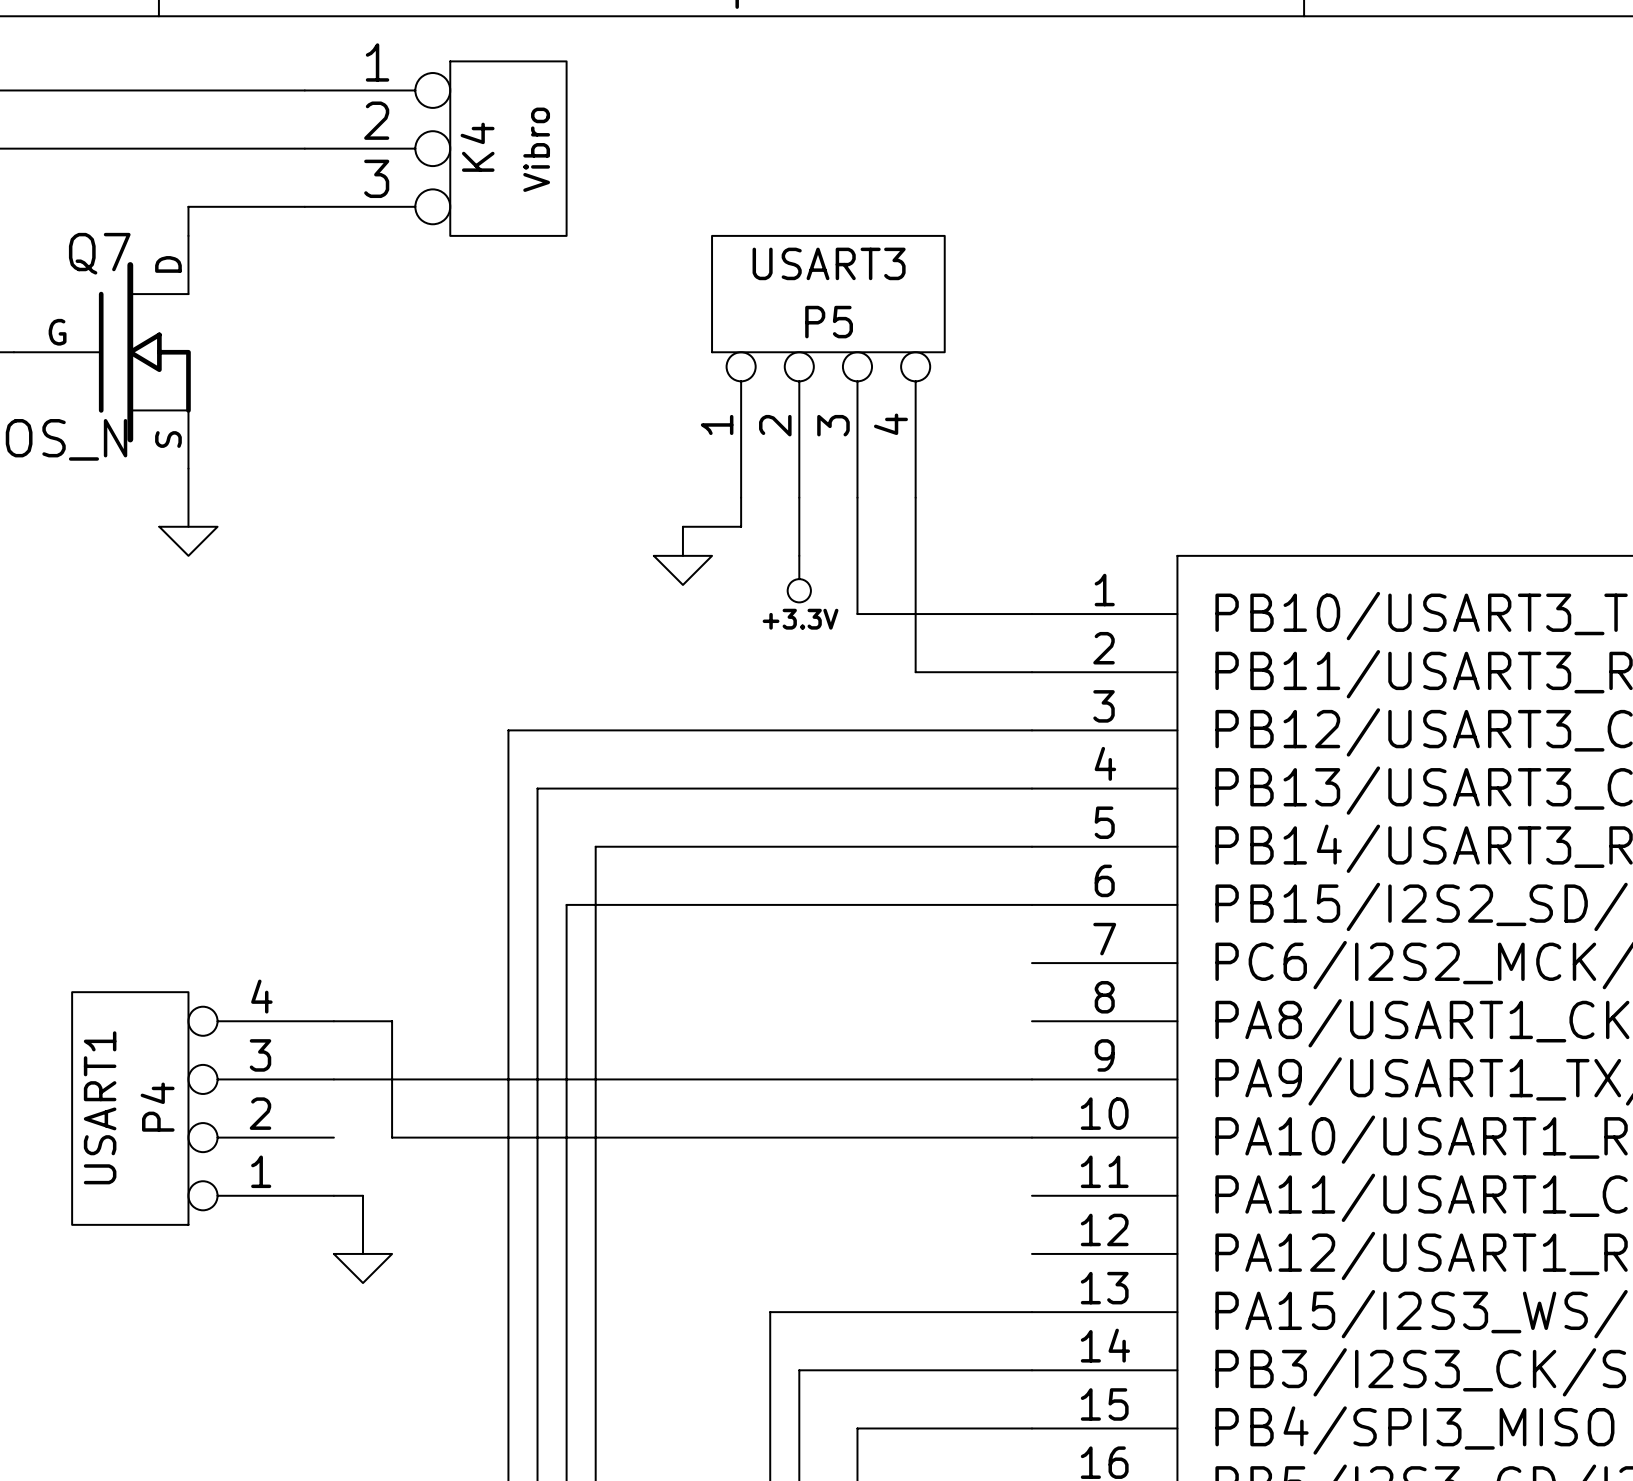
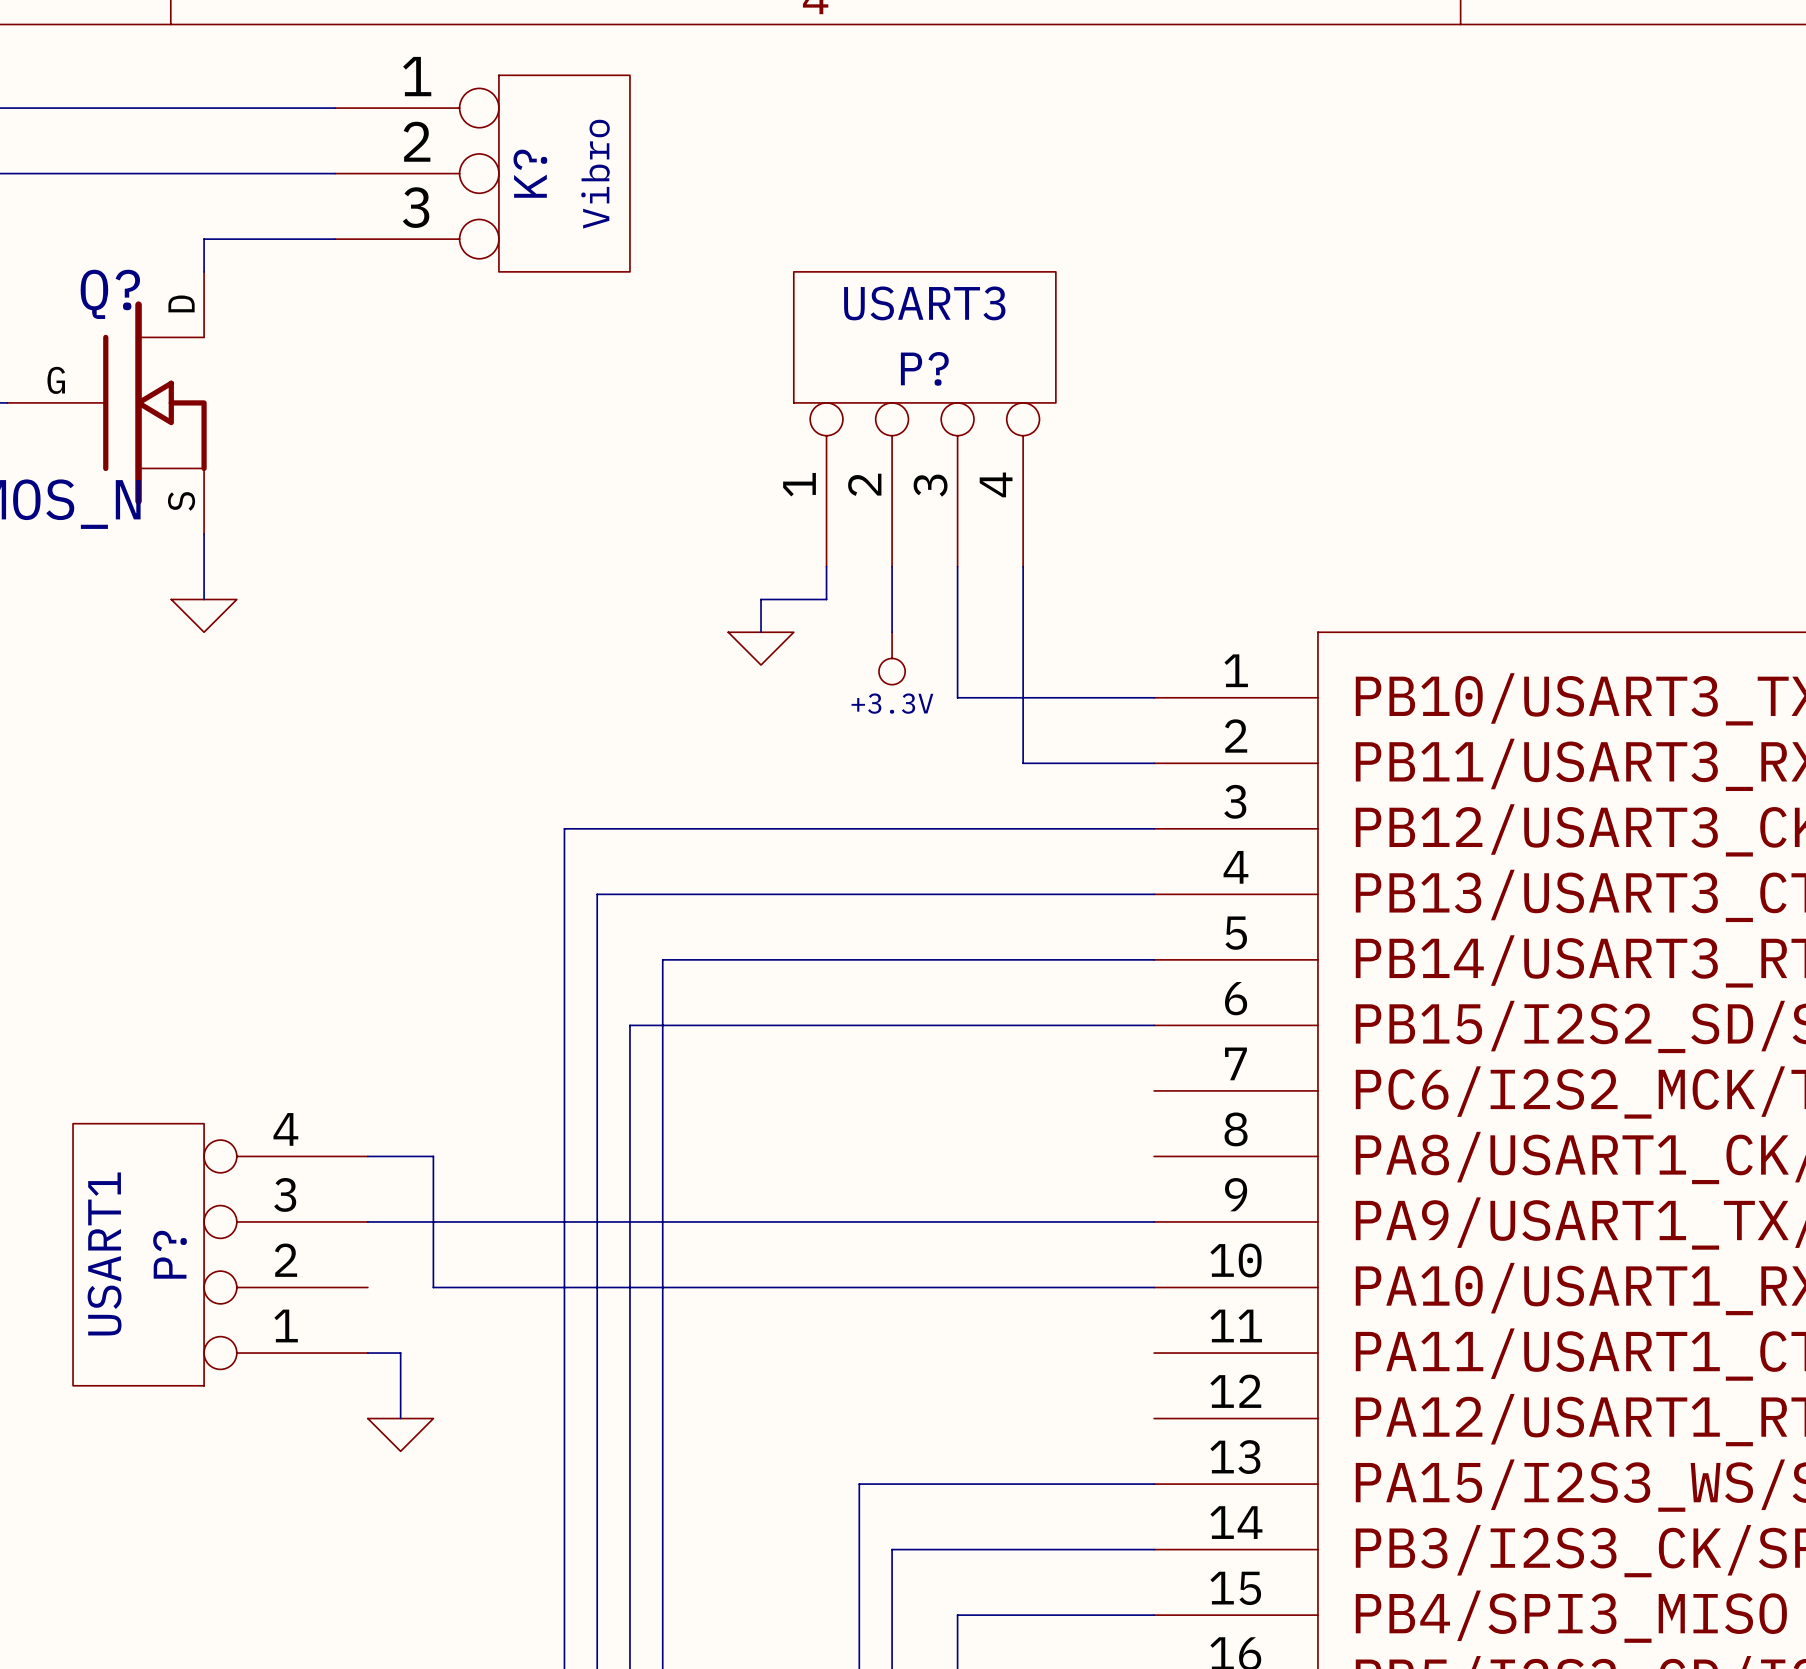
K4 name: K4 (477, 147) -> K? (530, 173)
Q7 name: Q7 (99, 253) -> Q? (110, 294)
P5 name: P5 (829, 322) -> P? (924, 368)
P4 name: P4 (157, 1107) -> P? (170, 1254)

